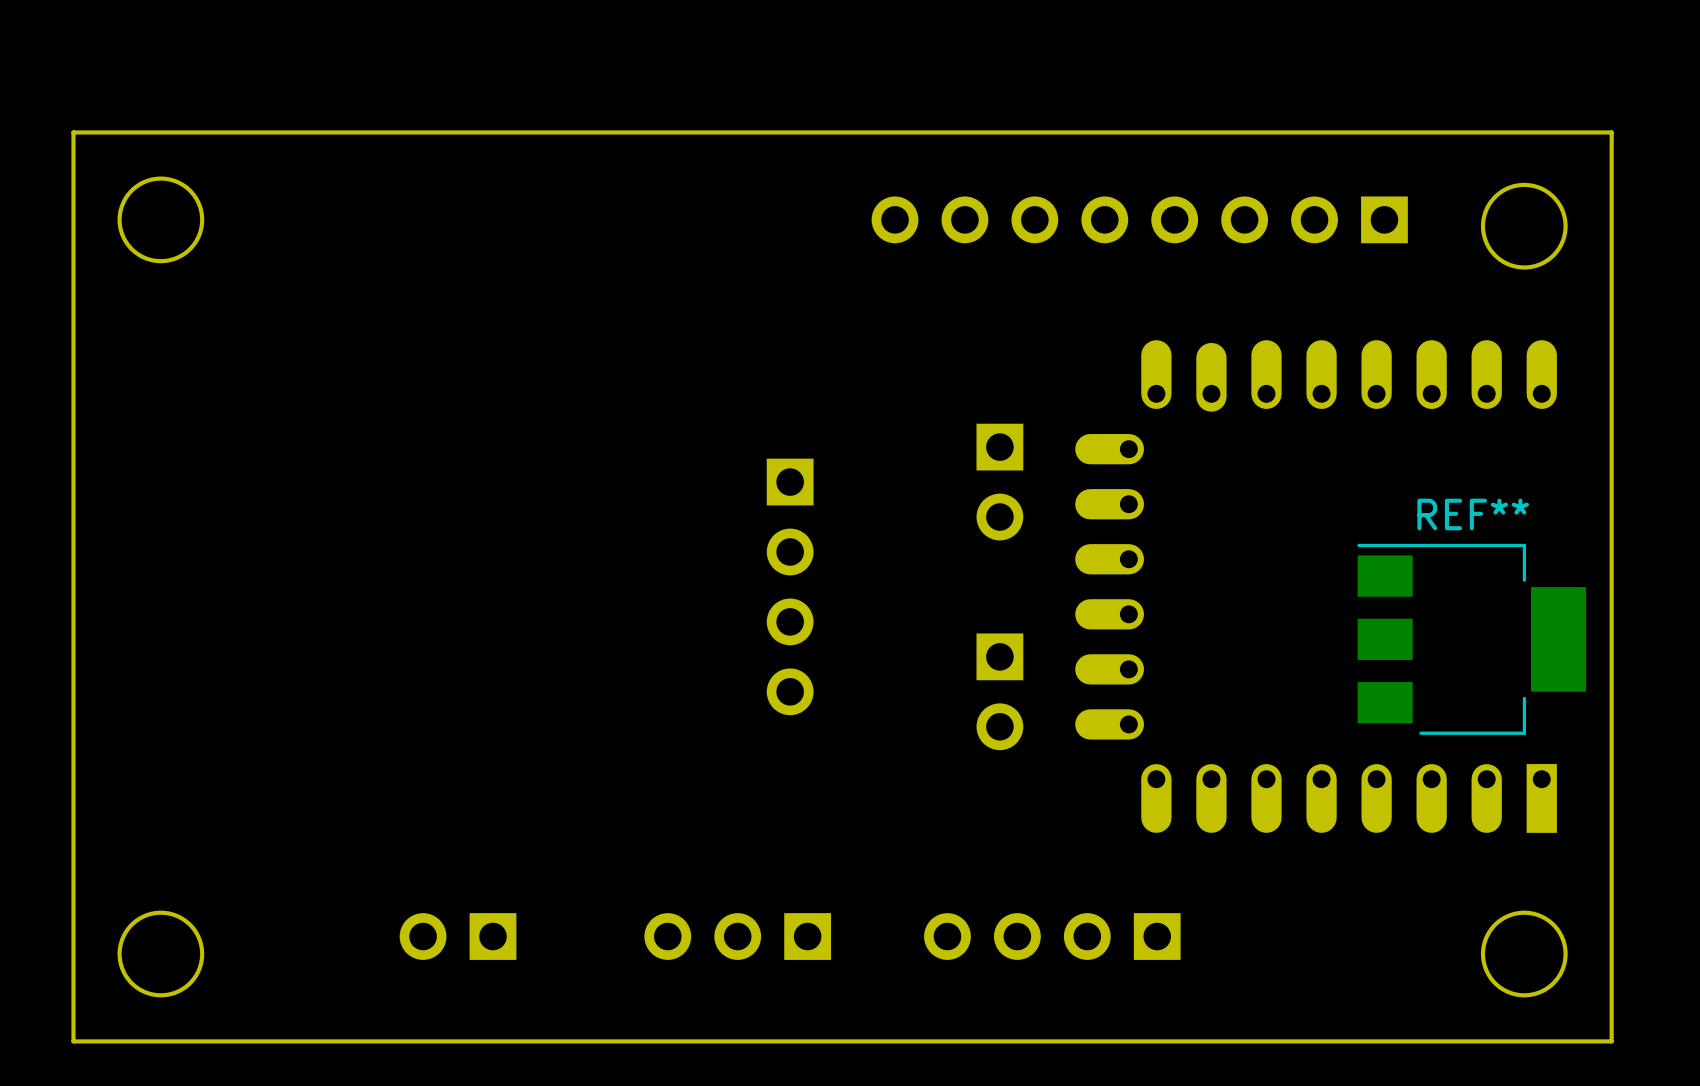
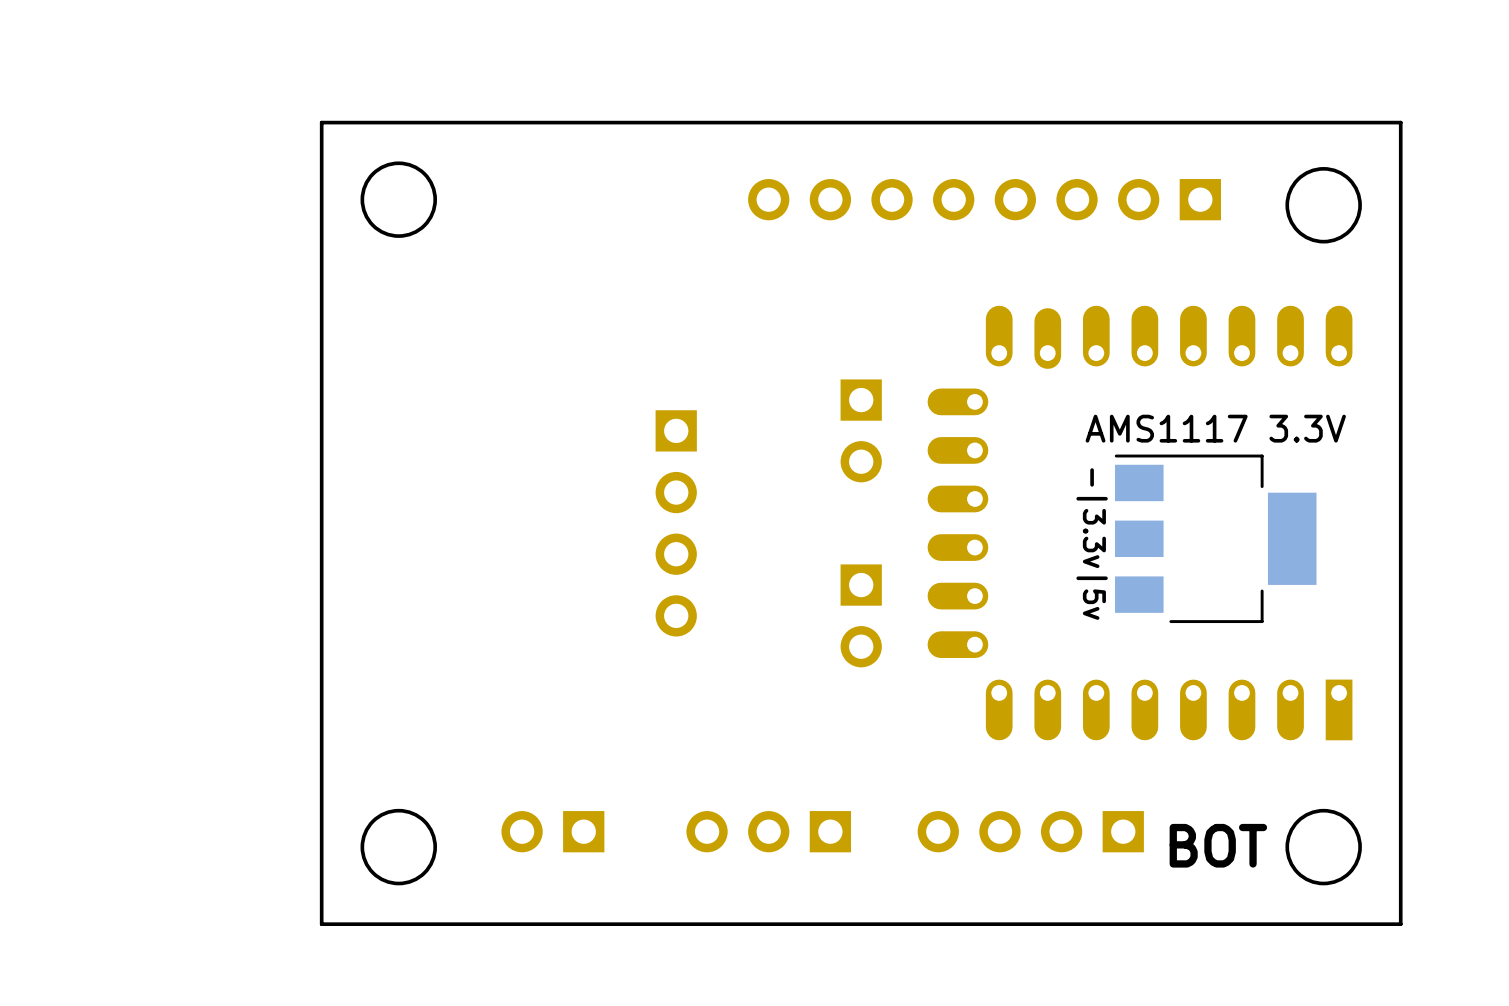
board edge: (388, 132) (73, 132) (73, 1041) (388, 1041) -> (321, 122) (321, 924)
round board edge position: (160, 219) -> (398, 199)
AMS1117 3.3V: none -> -|3.3v|5v (1215, 538)
REF**: (1471, 639) -> none
part position: (458, 936) -> (552, 831)
part position: (737, 936) -> (768, 831)
part position: (1052, 936) -> (1030, 831)
text: none -> BOT (1218, 845)
round board edge position: (160, 954) -> (398, 847)

